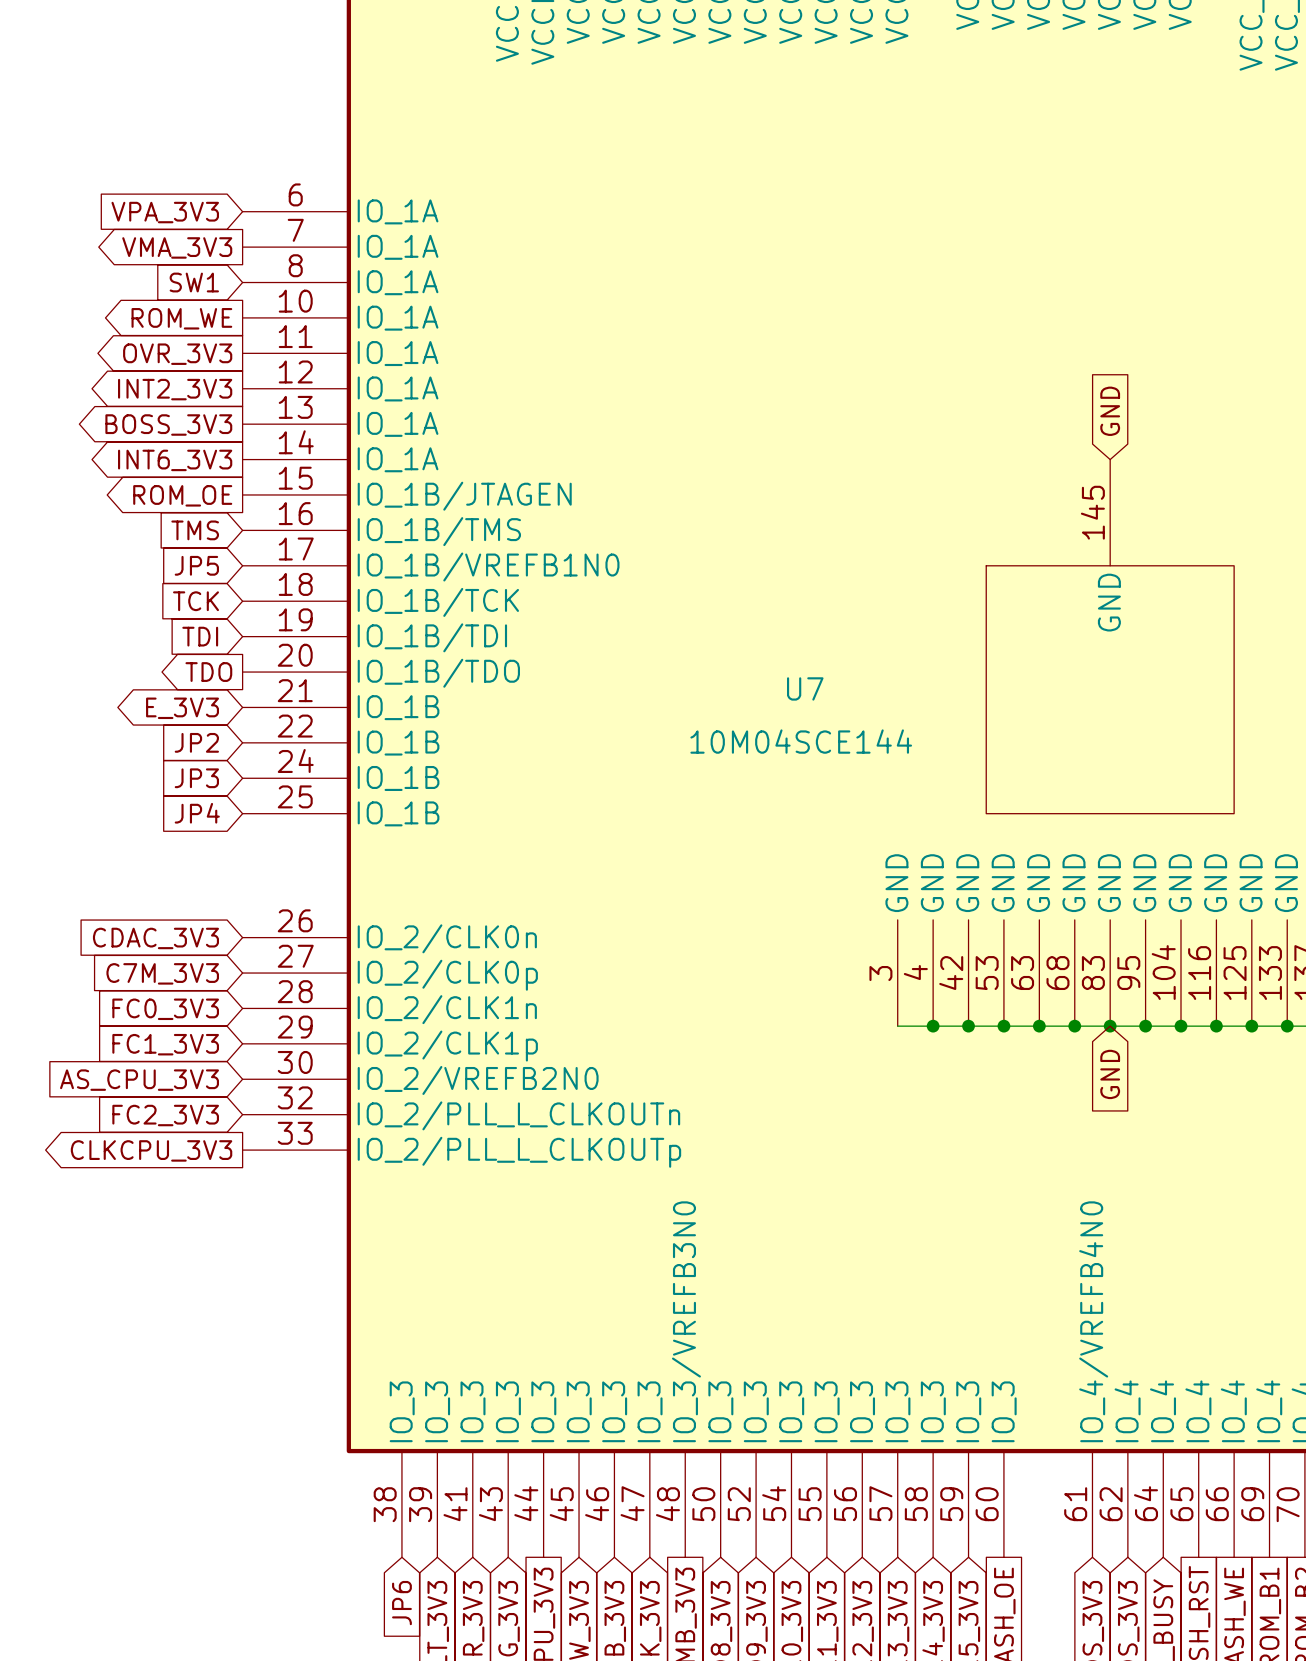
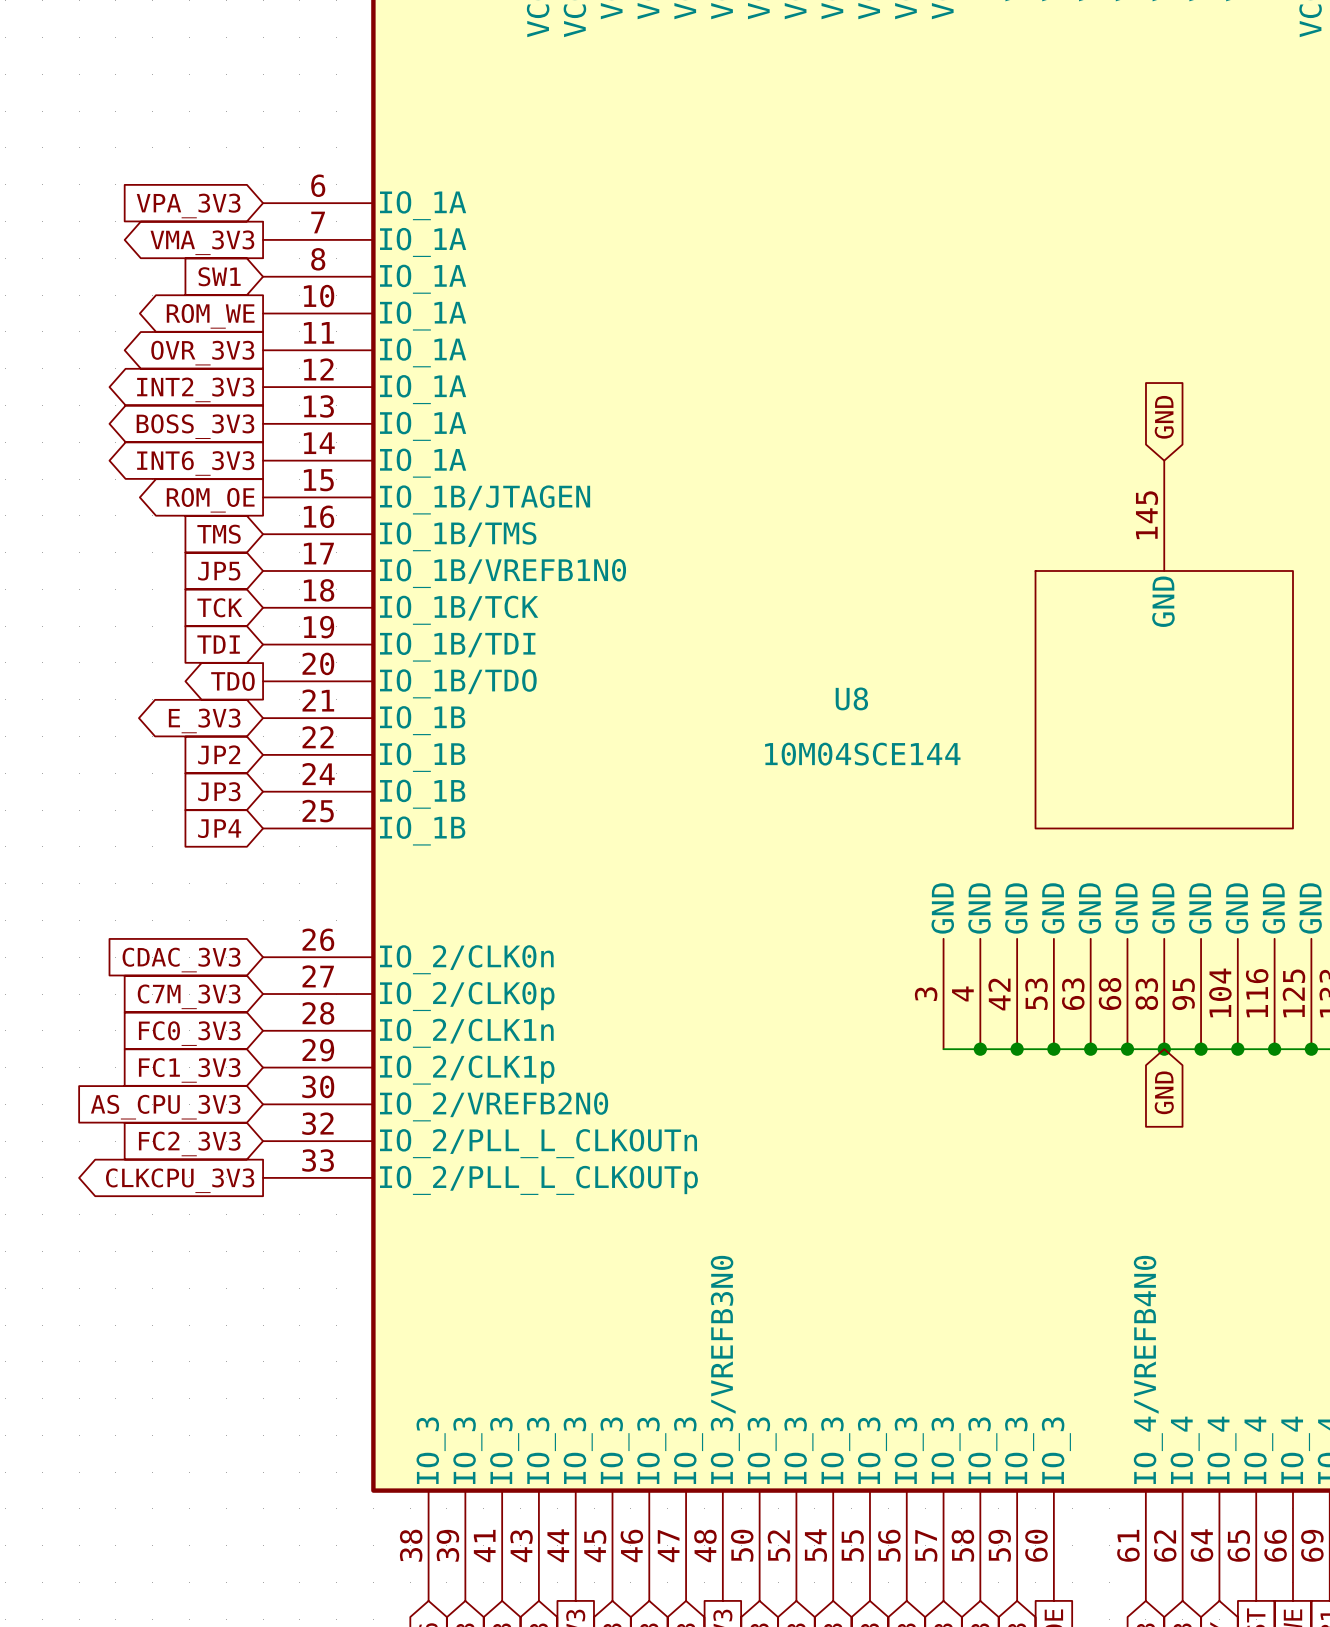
U7 name: U7 (805, 688) -> U8 (851, 698)

